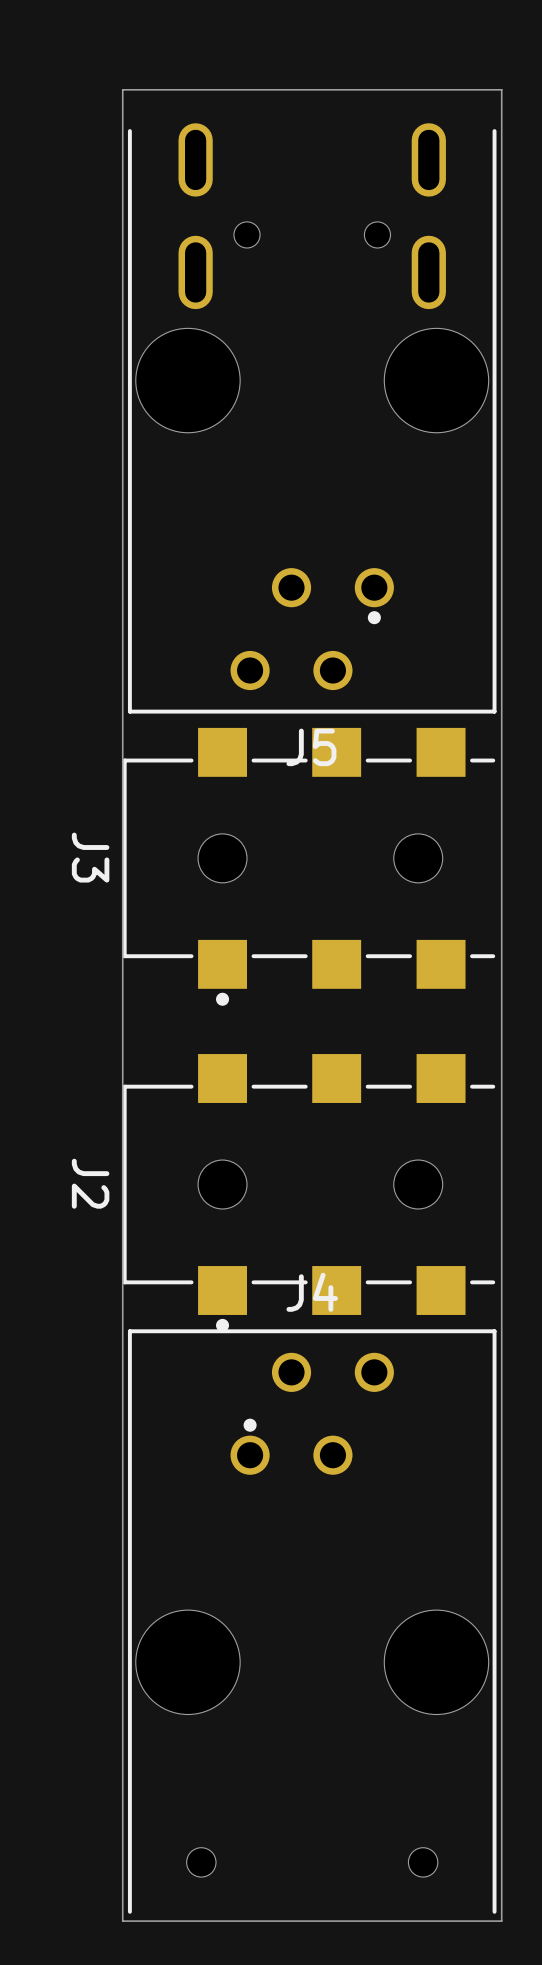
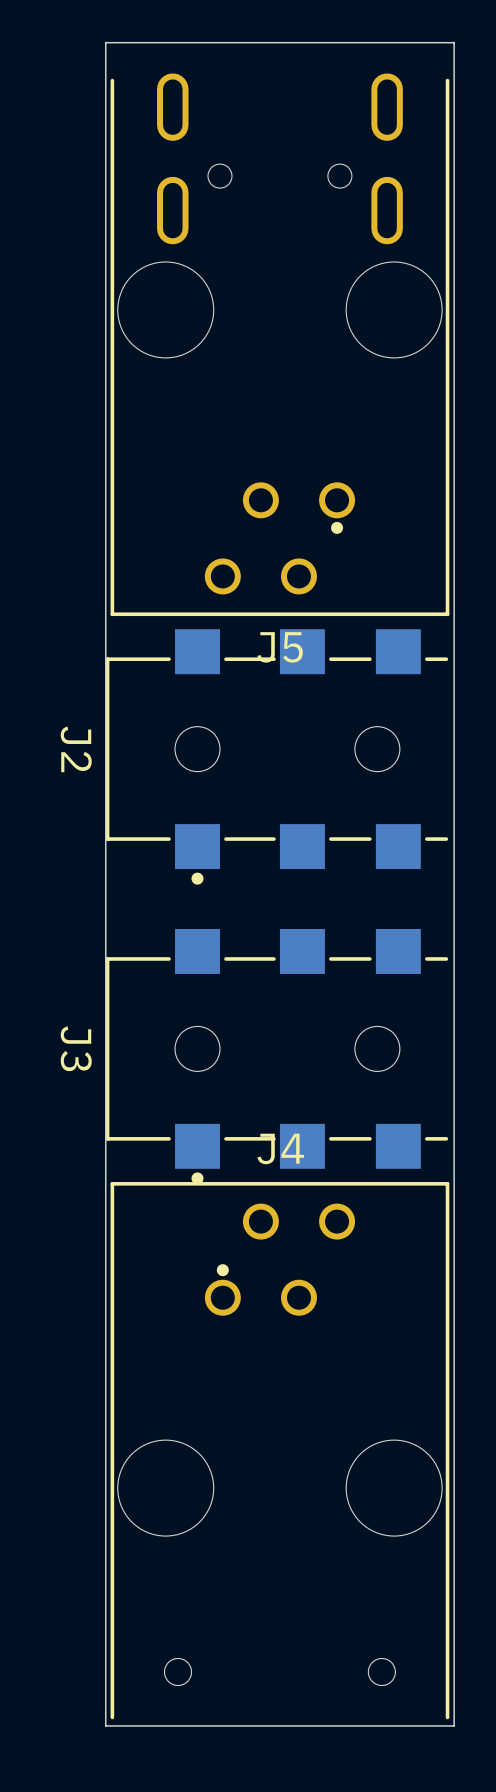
J3 name: J3 (90, 857) -> J2 (76, 749)
J2 name: J2 (90, 1183) -> J3 (76, 1048)

